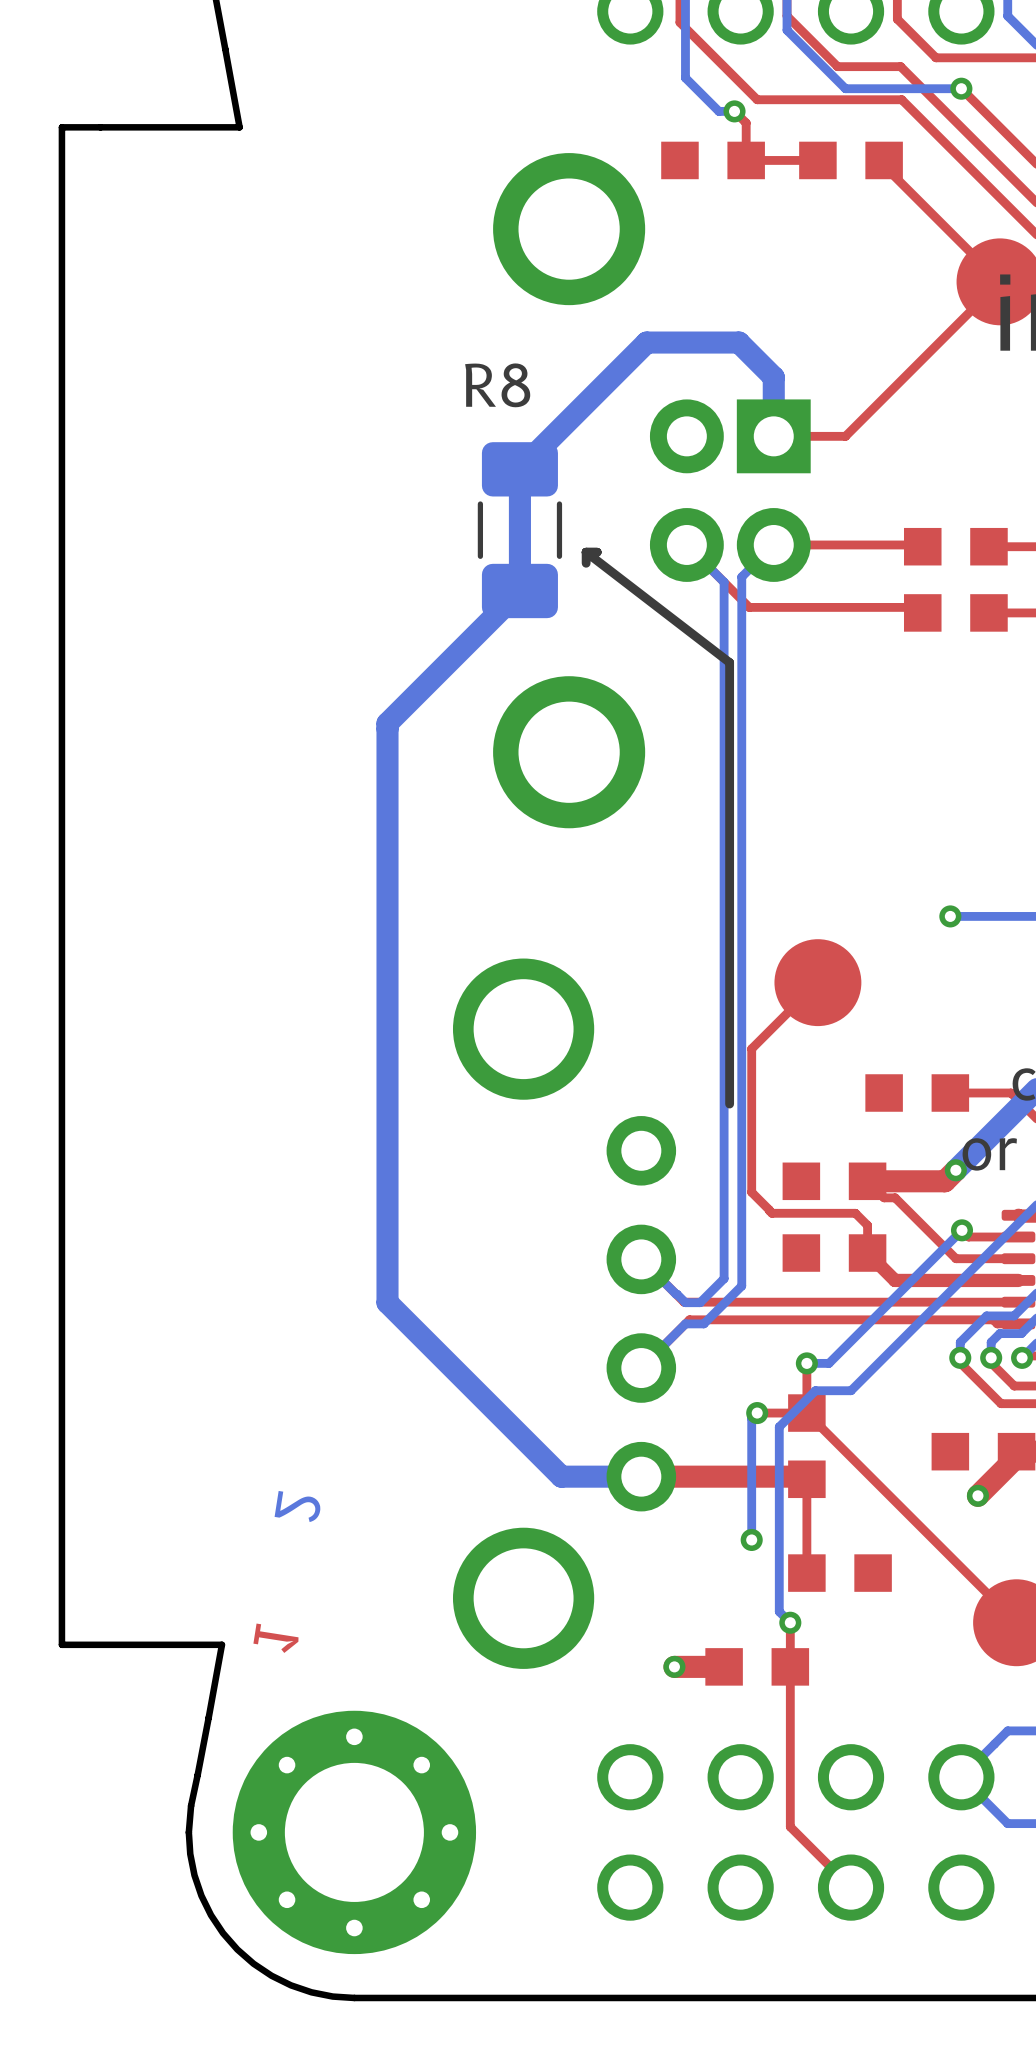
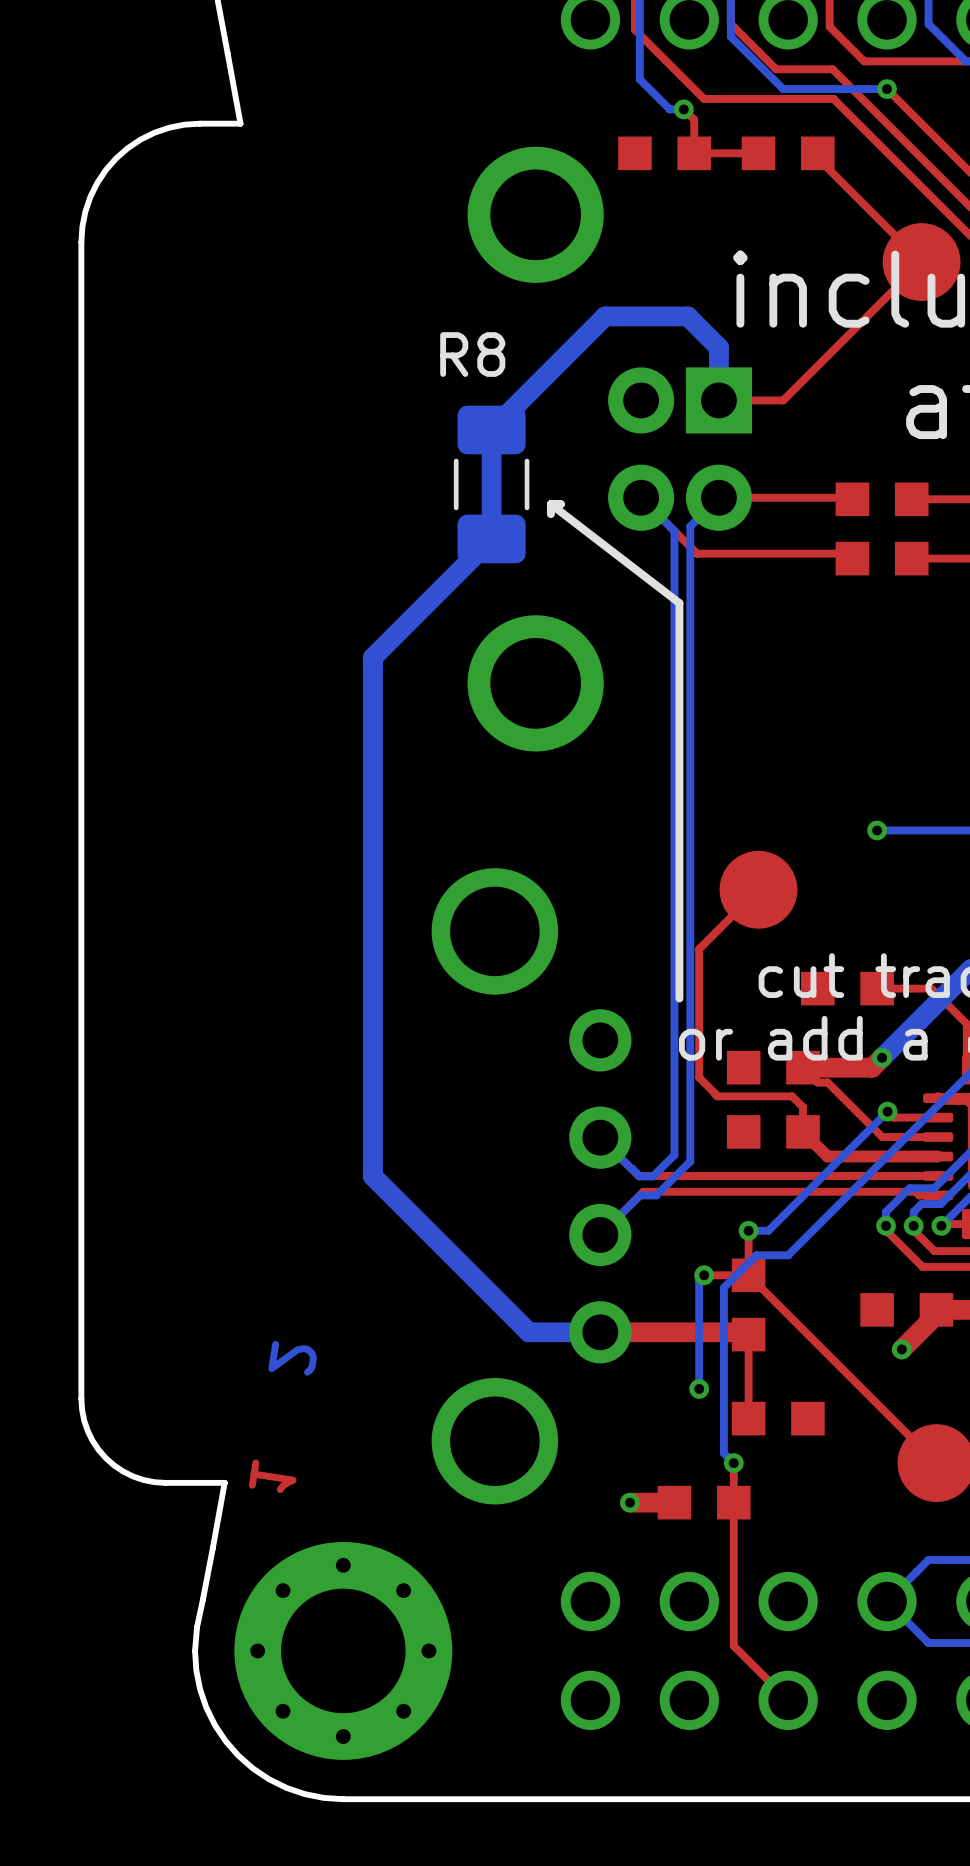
board edge: (194, 127) (61, 127) (61, 259) -> (200, 123) (184, 124) (154, 132) (140, 139) (116, 158) (105, 170) (90, 196) (85, 211) (81, 242)
board edge: (61, 1551) (61, 1644) (155, 1644) -> (81, 1398) (87, 1431) (105, 1458) (133, 1476) (165, 1482)

